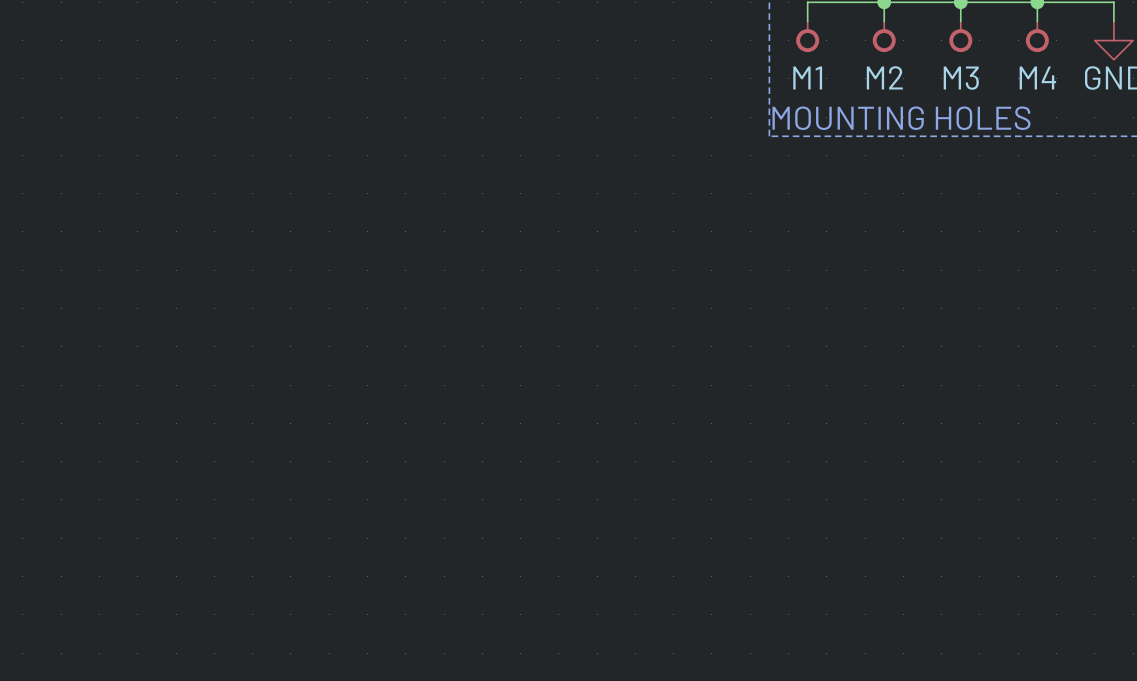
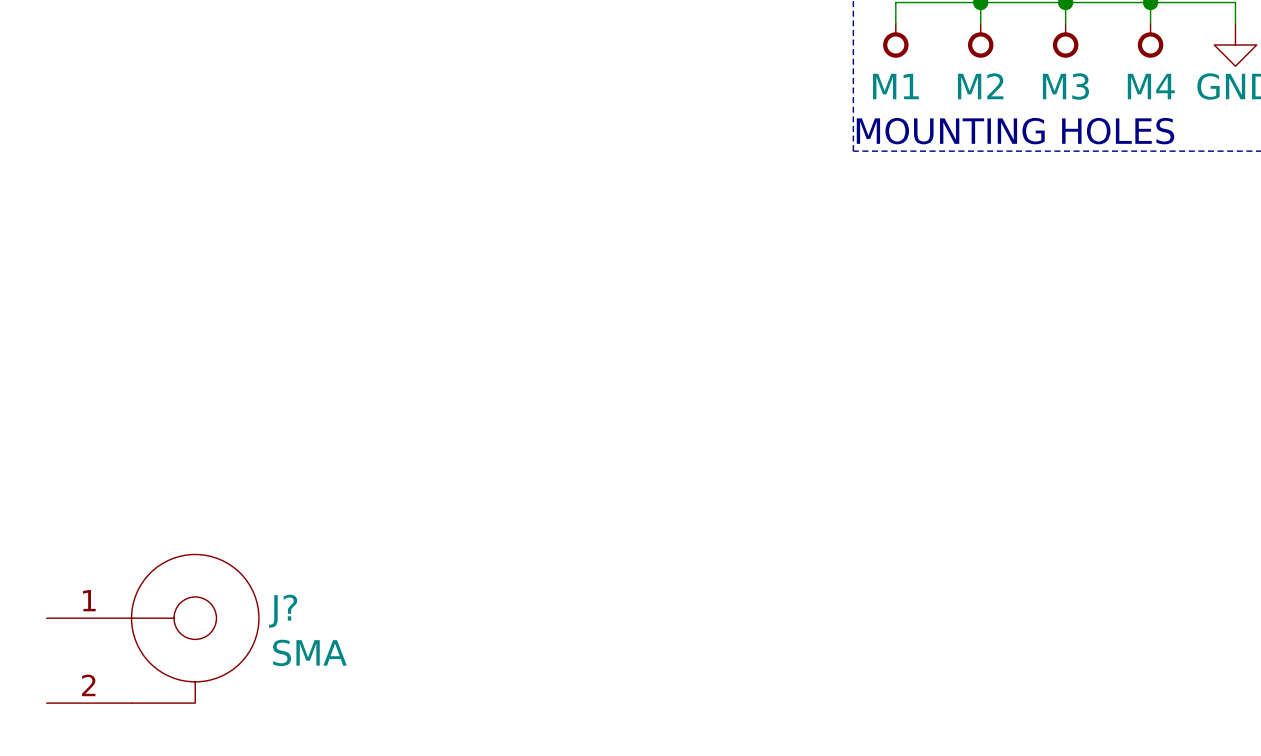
J?: none -> SMA (152, 628)

